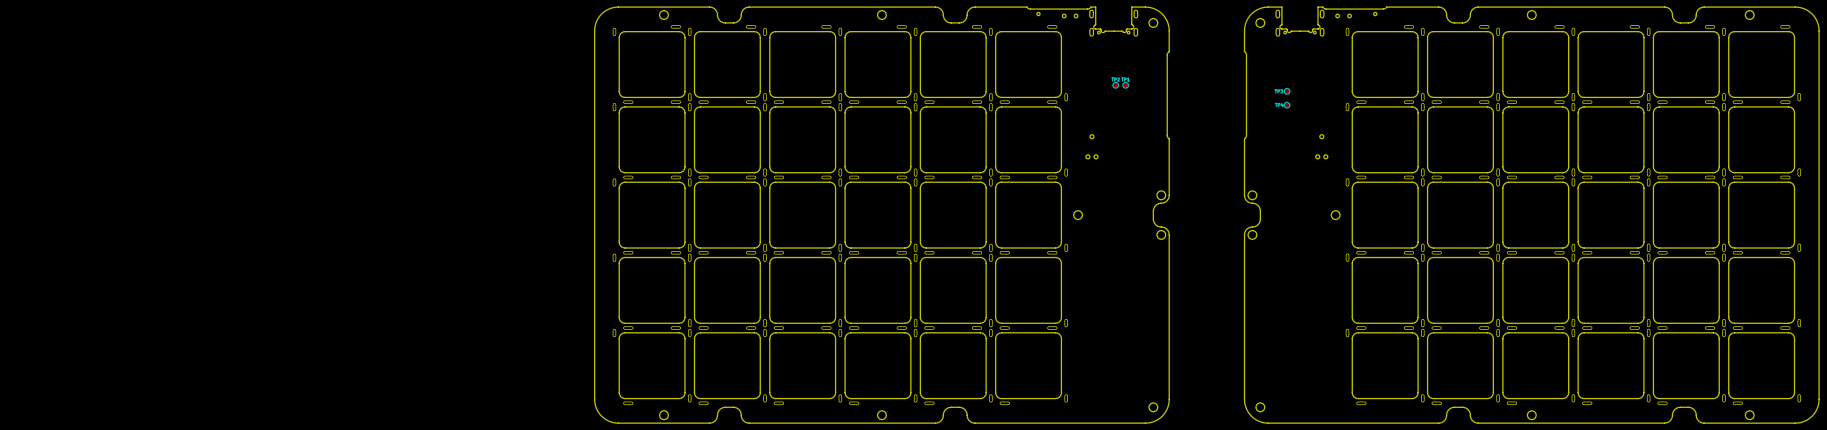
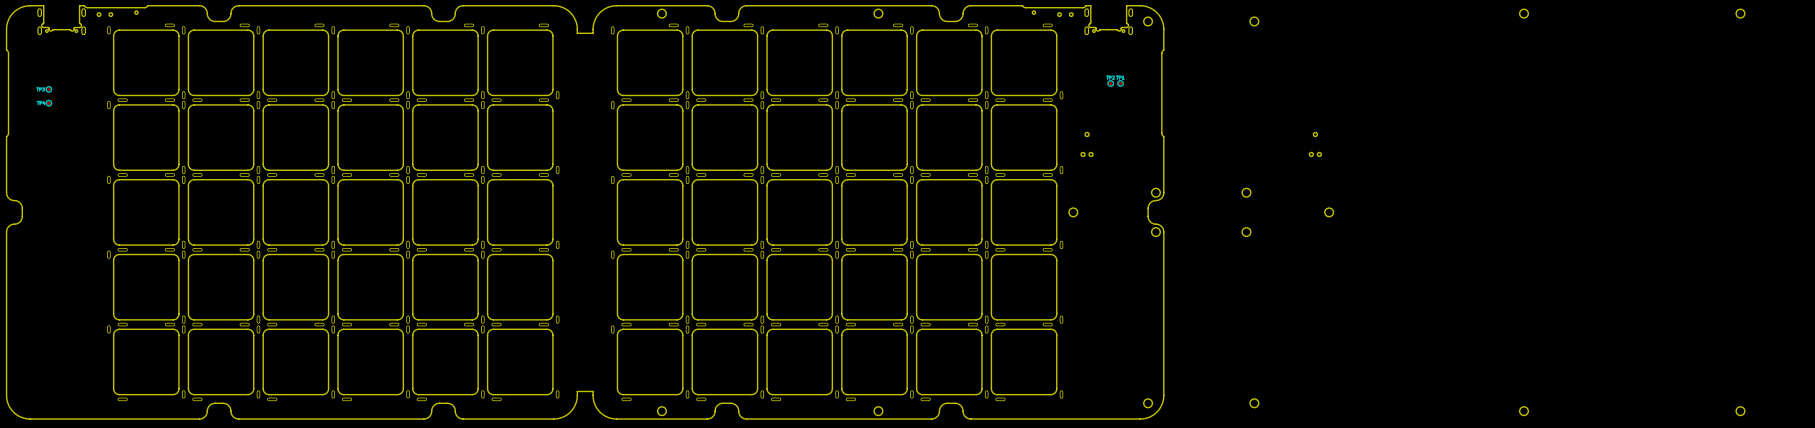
board edge: none -> (79, 5) (87, 7) (200, 5) (206, 9) (209, 19) (215, 21) (227, 20) (232, 8) (238, 5) (424, 5) (430, 9) (433, 19) (439, 21) (451, 20) (457, 8) (462, 5) (556, 5) (564, 8) (571, 14) (576, 22) (577, 33) (593, 33)
board edge: (1281, 7) (1265, 7) (1257, 9) (1248, 17) (1244, 28) (1246, 135) (1244, 138) (1244, 196) (1248, 202) (1258, 205) (1260, 211) (1259, 223) (1247, 228) (1244, 234) (1244, 399) (1247, 410) (1253, 417) (1268, 423) (1438, 423) (1444, 420) (1448, 410) (1454, 407) (1466, 408) (1472, 420) (1478, 423) (1665, 423) (1671, 419) (1674, 409) (1680, 407) (1692, 408) (1697, 420) (1704, 423) (1797, 423) (1806, 420) (1813, 414) (1819, 399) (1819, 30) (1817, 21) (1810, 12) (1797, 7) (1703, 7) (1697, 10) (1692, 21) (1680, 22) (1674, 20) (1671, 10) (1665, 7) (1478, 7) (1472, 10) (1466, 21) (1454, 22) (1448, 20) (1445, 10) (1439, 7) (1326, 9) (1317, 7) -> none
part: none -> (136, 12)
part: (1375, 14) -> none
part: none -> (104, 14)
part: (1343, 16) -> none
part: none -> (61, 20)
part: (1299, 21) -> none
board edge: (594, 34) (594, 395) -> (43, 5) (27, 5) (19, 8) (10, 16) (6, 27) (8, 133) (6, 136) (6, 193) (10, 199) (19, 202) (22, 208) (21, 220) (9, 225) (6, 232) (6, 397) (9, 406) (17, 415) (30, 419) (200, 418) (205, 416) (210, 404) (223, 403) (228, 405) (232, 415) (237, 418) (423, 419) (429, 416) (435, 404) (447, 403) (452, 405) (456, 415) (462, 418) (553, 419) (562, 417) (571, 410) (576, 402) (577, 391) (593, 391)
part: none -> (146, 62)
part: none -> (221, 62)
part: none -> (295, 62)
part: none -> (370, 62)
part: none -> (445, 62)
part: none -> (520, 62)
part: (1385, 64) -> none
part: (1460, 64) -> none
part: (1535, 64) -> none
part: (1611, 64) -> none
part: (1686, 64) -> none
part: (1761, 64) -> none
part position: (1287, 91) -> (48, 89)
part position: (1287, 105) -> (48, 103)
part: none -> (146, 137)
part: none -> (221, 137)
part: none -> (295, 137)
part: none -> (370, 137)
part: none -> (445, 137)
part: none -> (520, 137)
part: (1385, 139) -> none
part: (1460, 139) -> none
part: (1535, 139) -> none
part: (1611, 139) -> none
part: (1686, 139) -> none
part: (1761, 139) -> none
part: none -> (146, 212)
part: none -> (221, 212)
part: none -> (295, 212)
part: none -> (370, 212)
part: none -> (445, 212)
part: none -> (520, 212)
part: (1385, 215) -> none
part: (1460, 215) -> none
part: (1535, 215) -> none
part: (1611, 215) -> none
part: (1686, 215) -> none
part: (1761, 215) -> none
part: none -> (146, 287)
part: none -> (221, 287)
part: none -> (295, 287)
part: none -> (370, 287)
part: none -> (445, 287)
part: none -> (520, 287)
part: (1385, 290) -> none
part: (1460, 290) -> none
part: (1535, 290) -> none
part: (1611, 290) -> none
part: (1686, 290) -> none
part: (1761, 290) -> none
part: none -> (146, 361)
part: none -> (221, 361)
part: none -> (295, 361)
part: none -> (370, 361)
part: none -> (445, 361)
part: none -> (520, 361)
part: (1385, 365) -> none
part: (1460, 365) -> none
part: (1535, 365) -> none
part: (1611, 365) -> none
part: (1686, 365) -> none
part: (1761, 365) -> none

